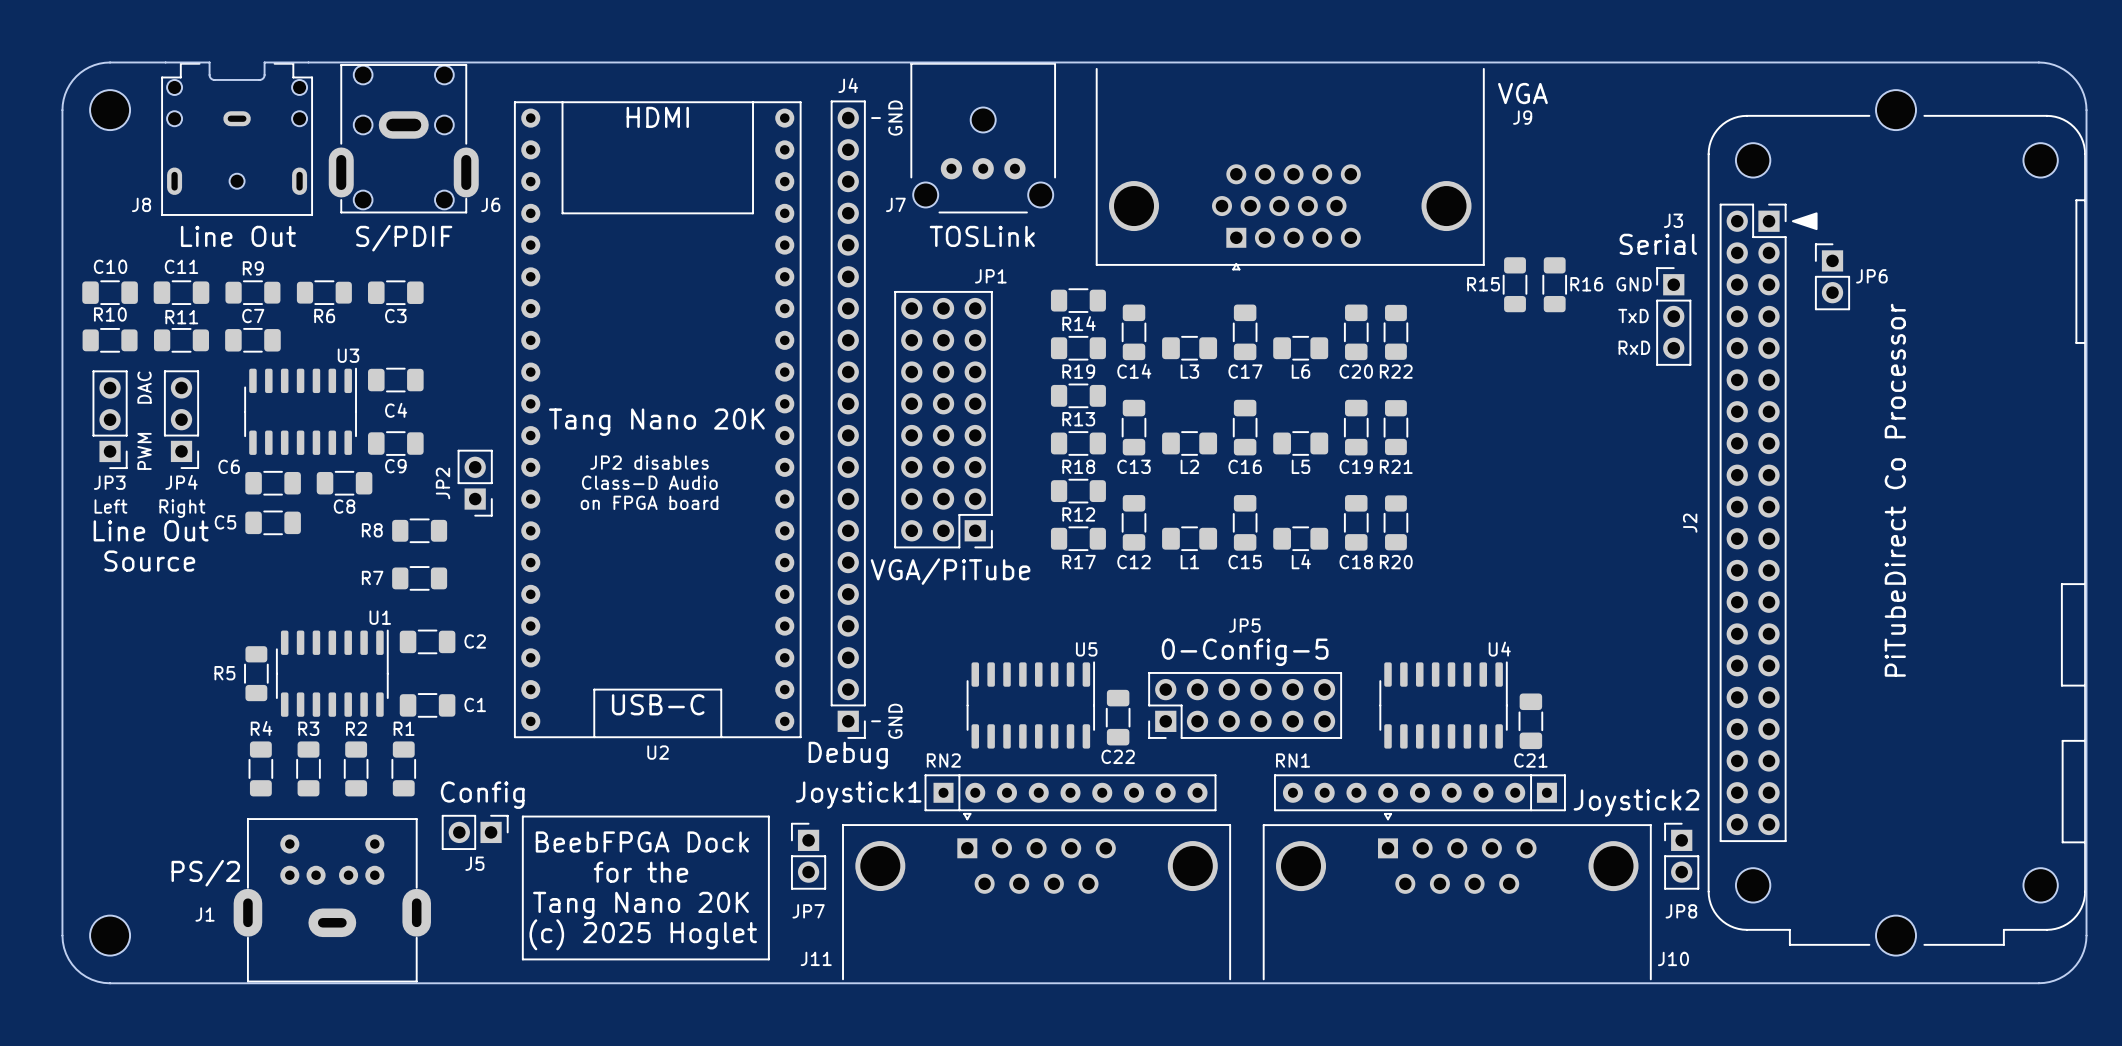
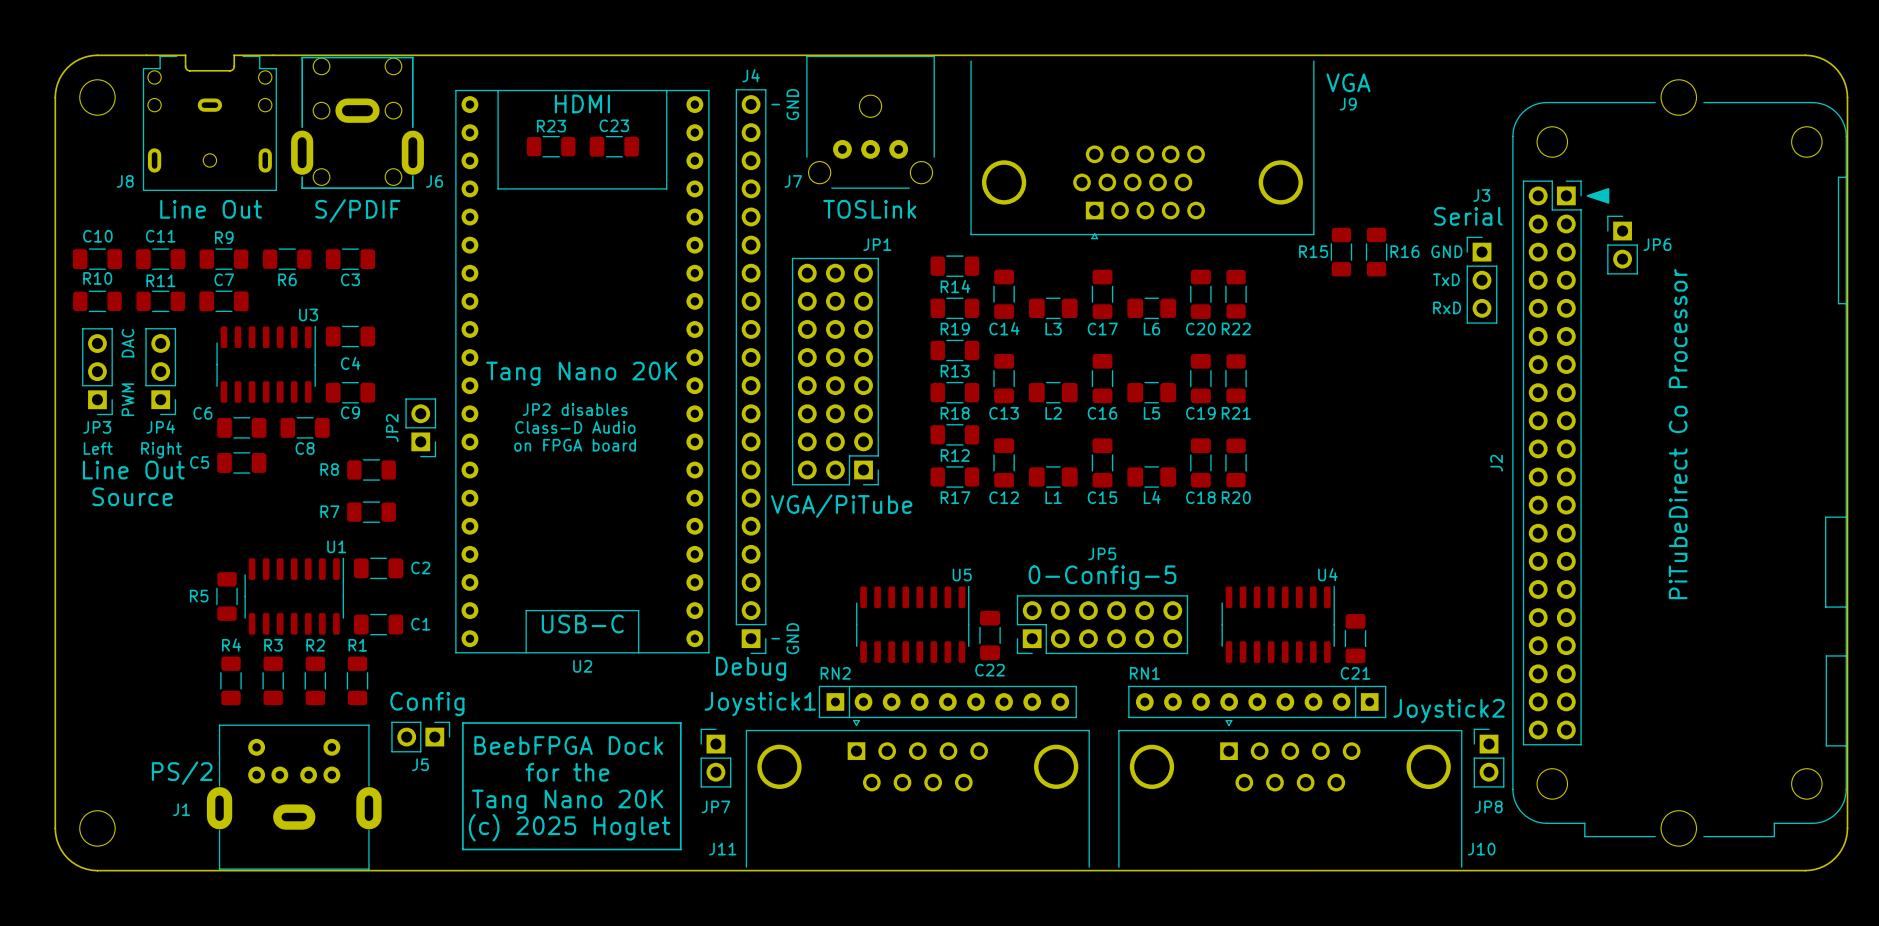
R23: none -> (551, 146)
C23: none -> (614, 146)

